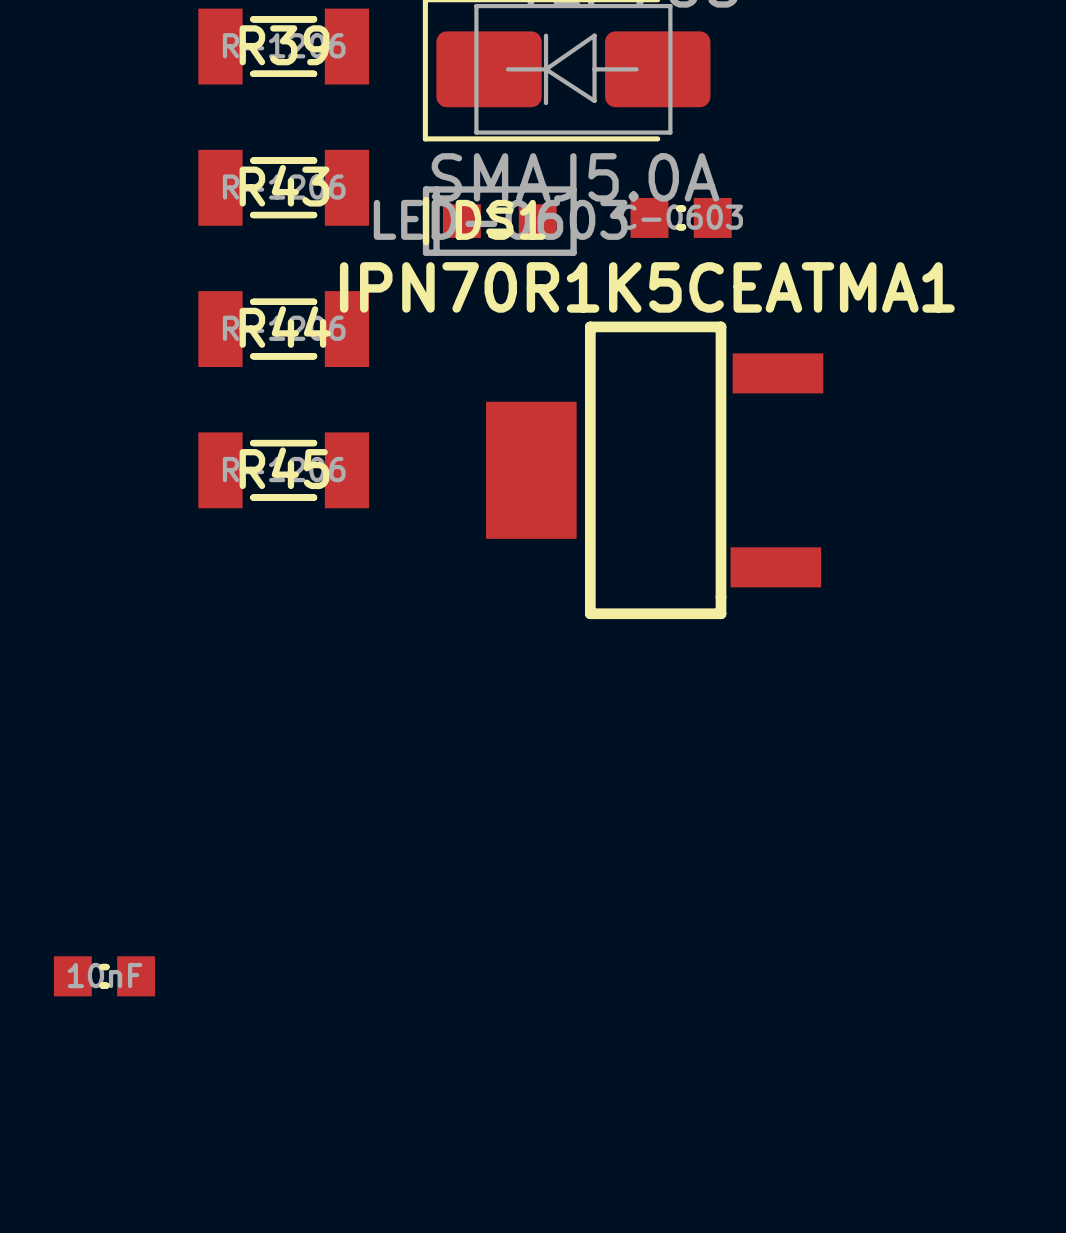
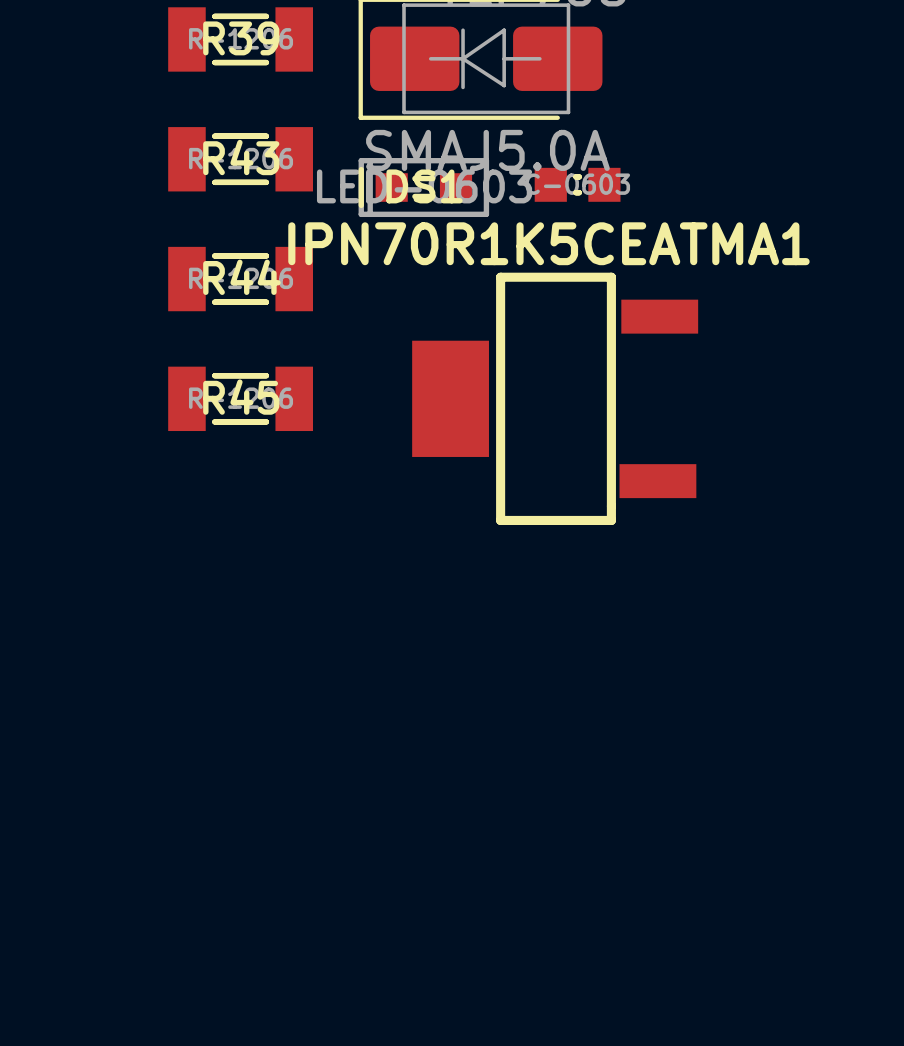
part: 10nF (104, 976) -> none

